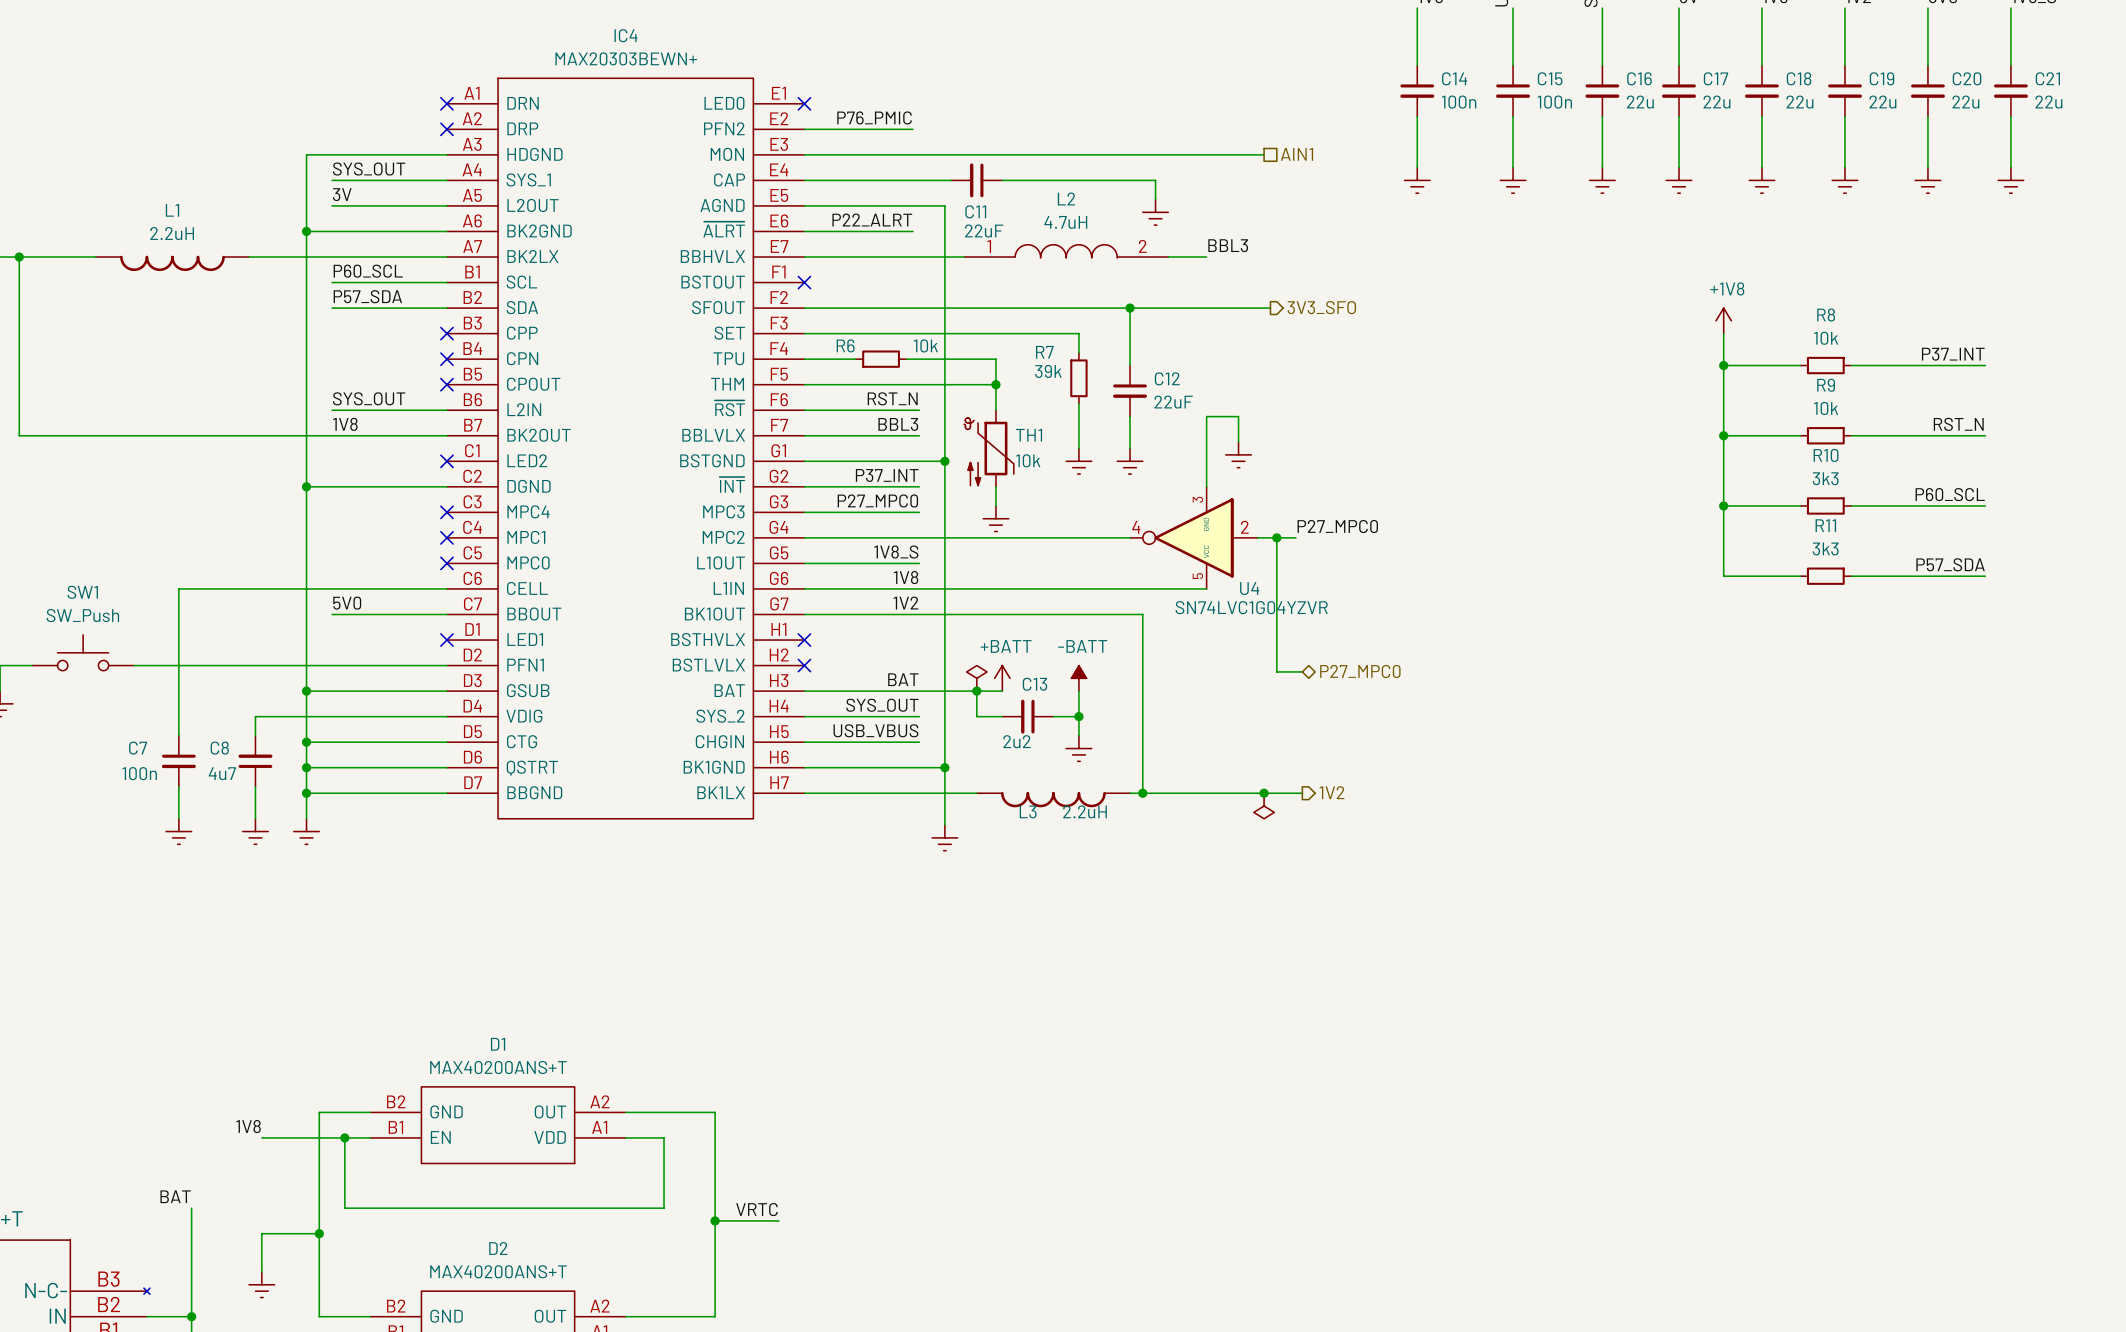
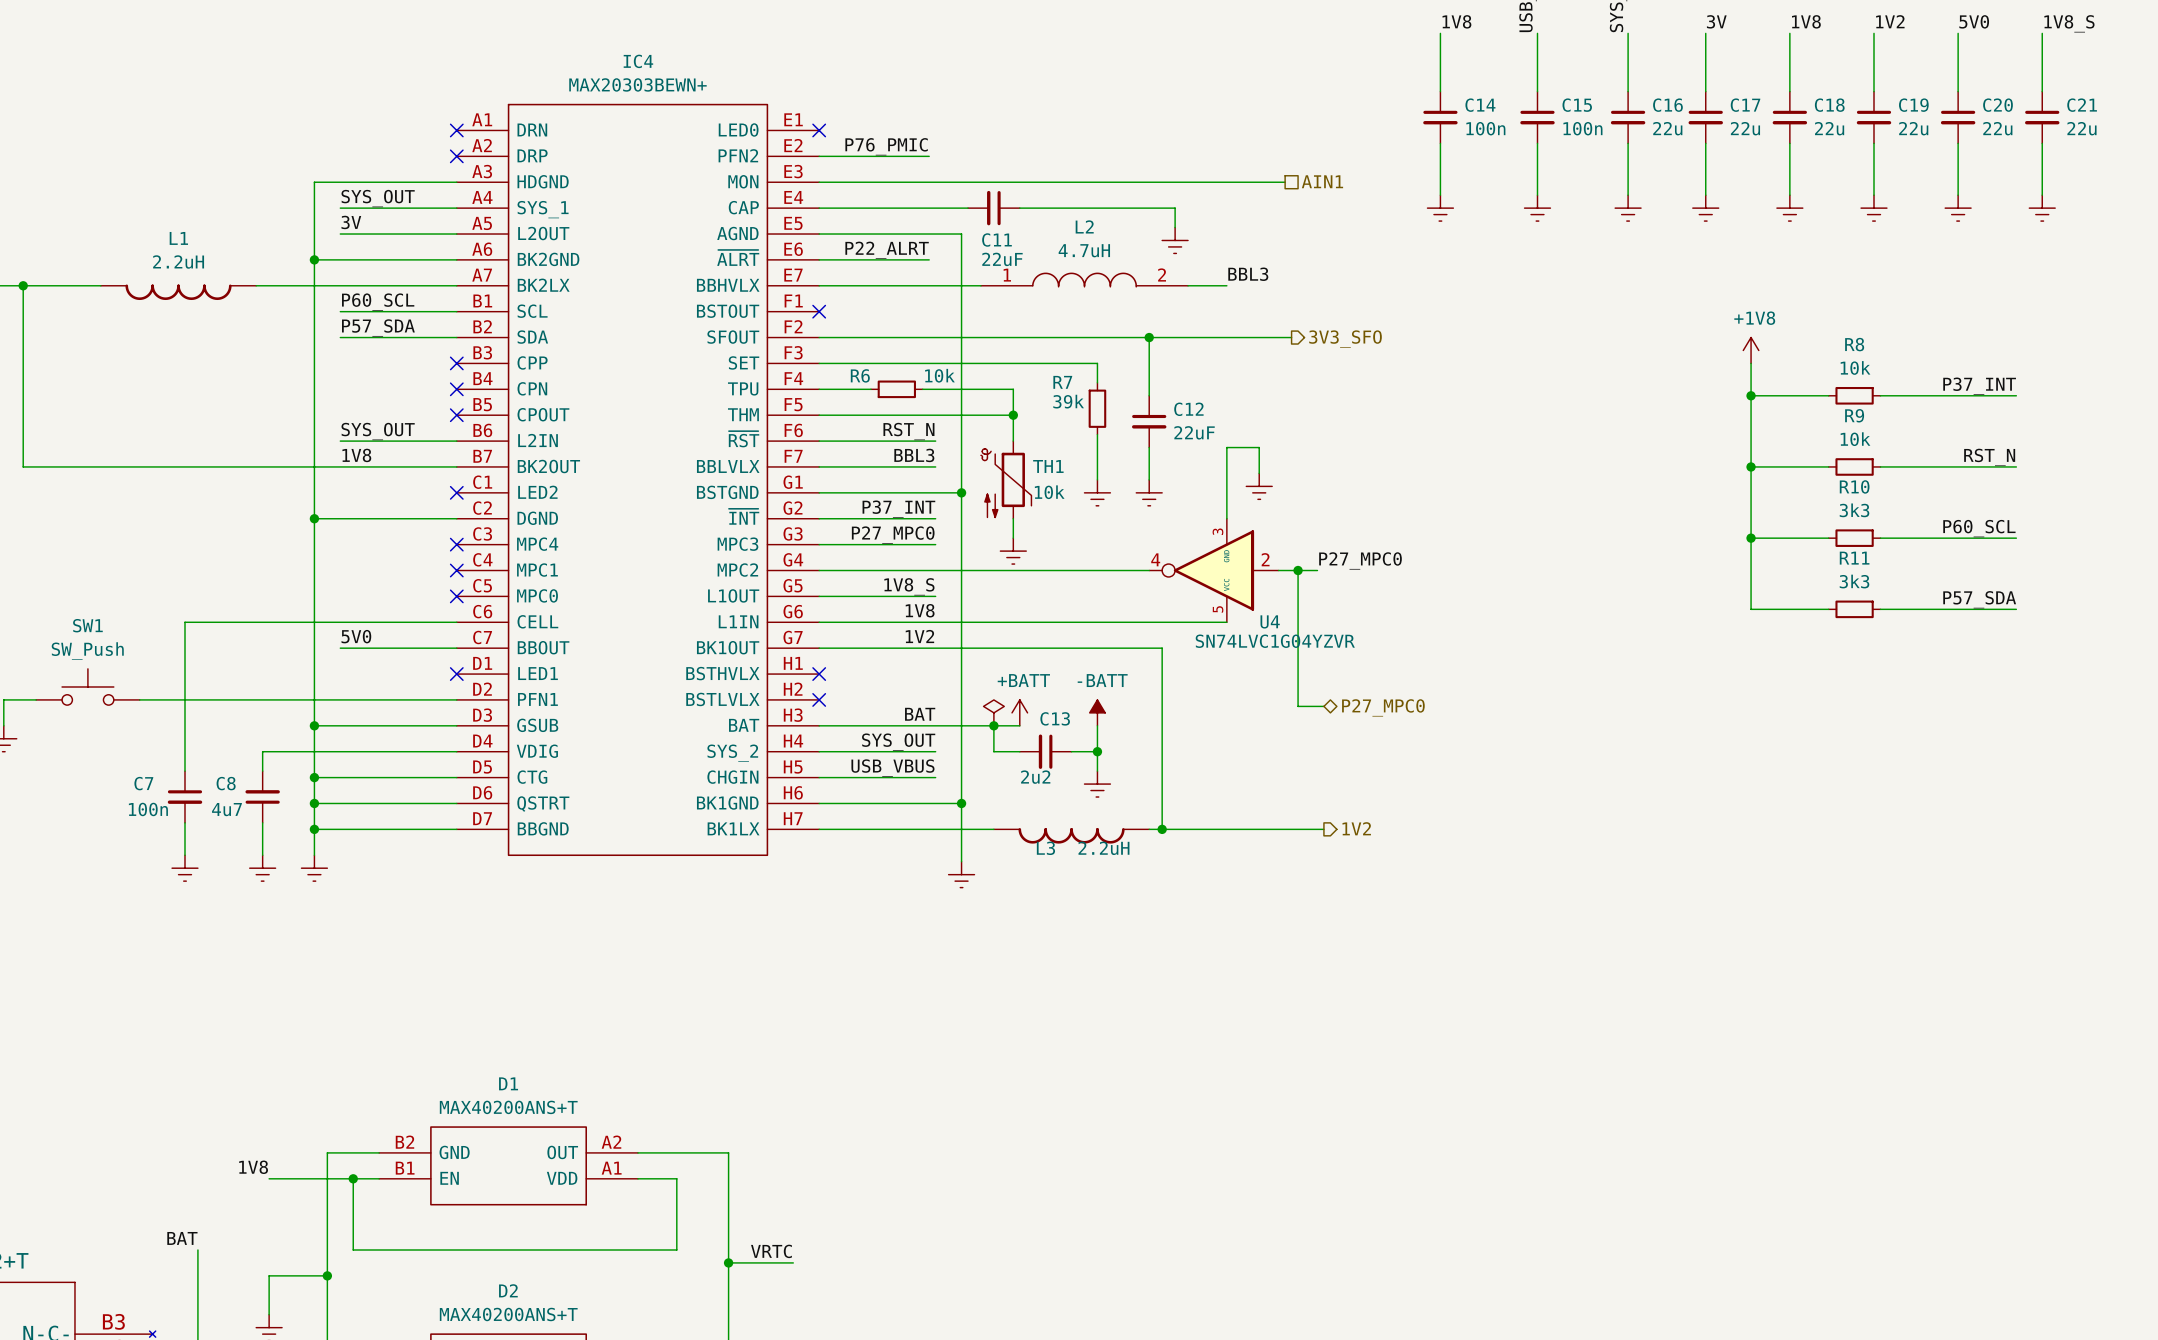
junction: (1264, 793) -> none
power symbol: (1264, 806) -> none

